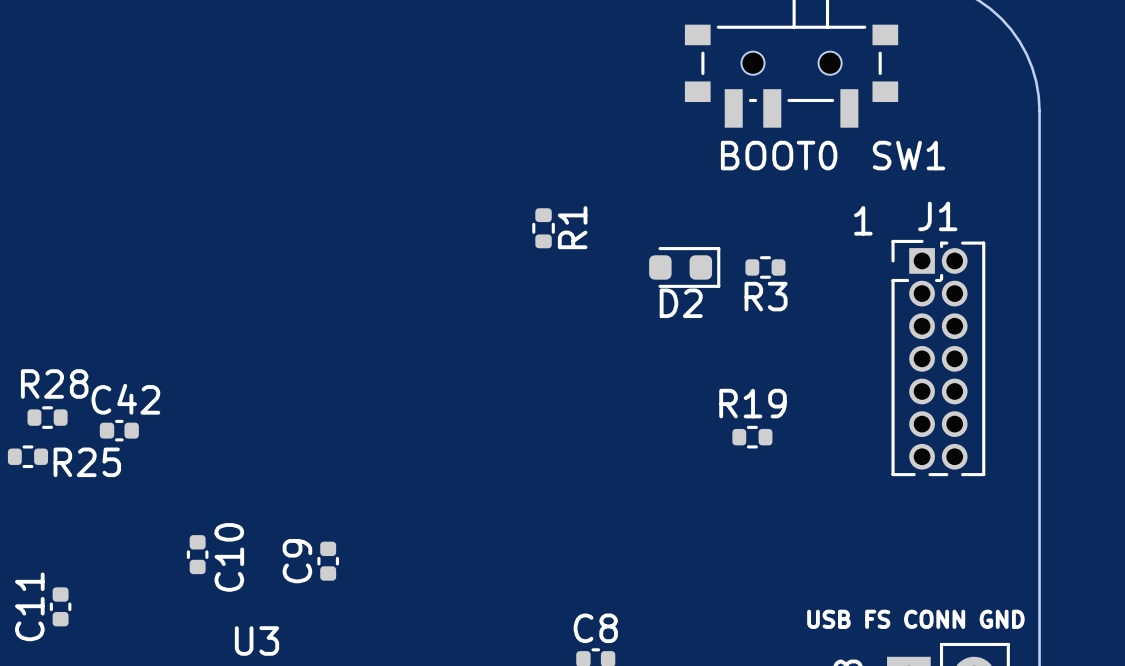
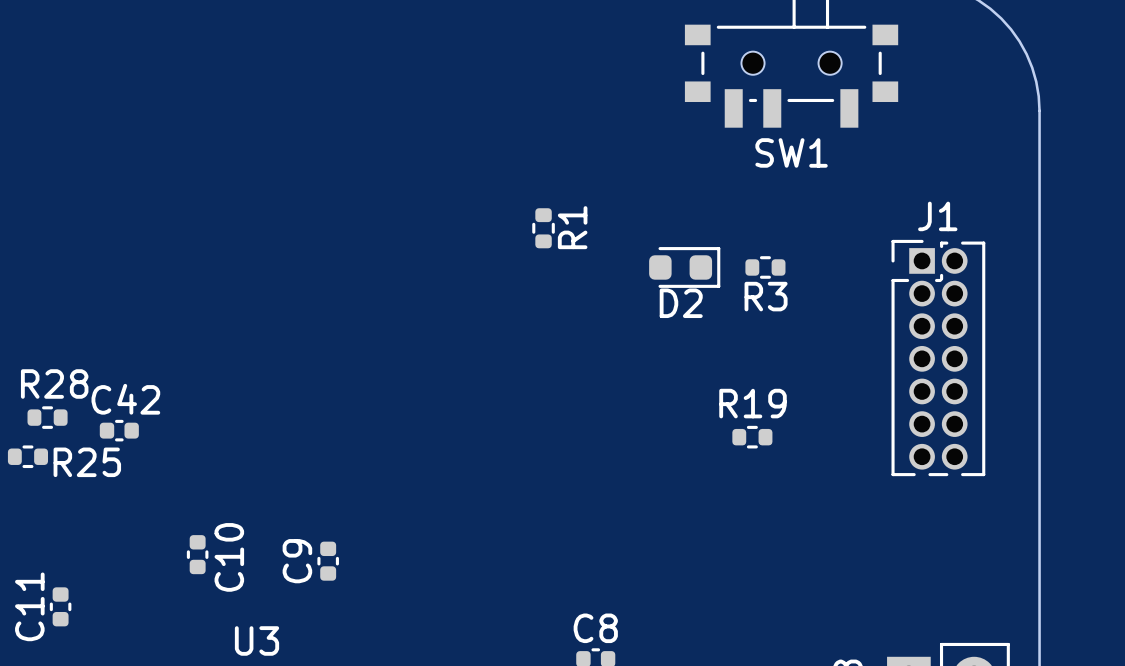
text: BOOT0 (779, 155) -> none
SW1 name position: SW1 (909, 155) -> SW1 (791, 152)
text: 1 (863, 220) -> none
text: USB FS CONN GND (915, 619) -> none

